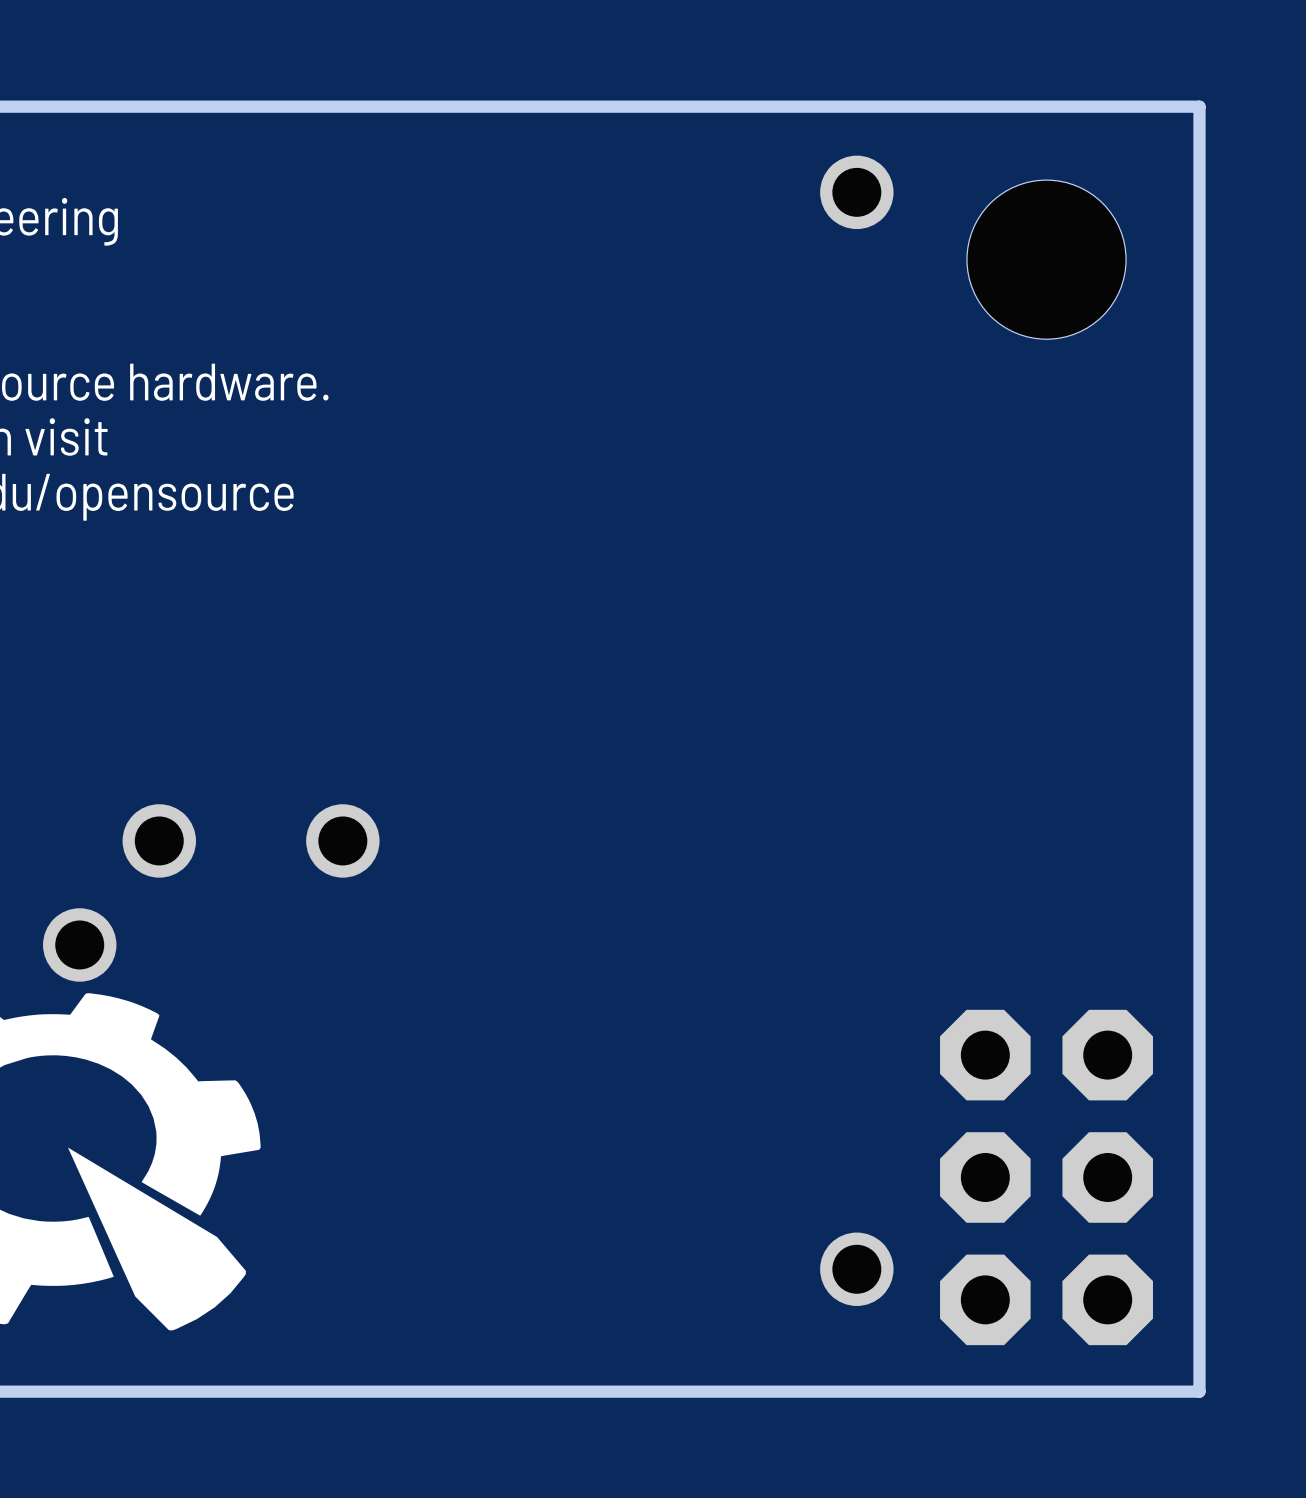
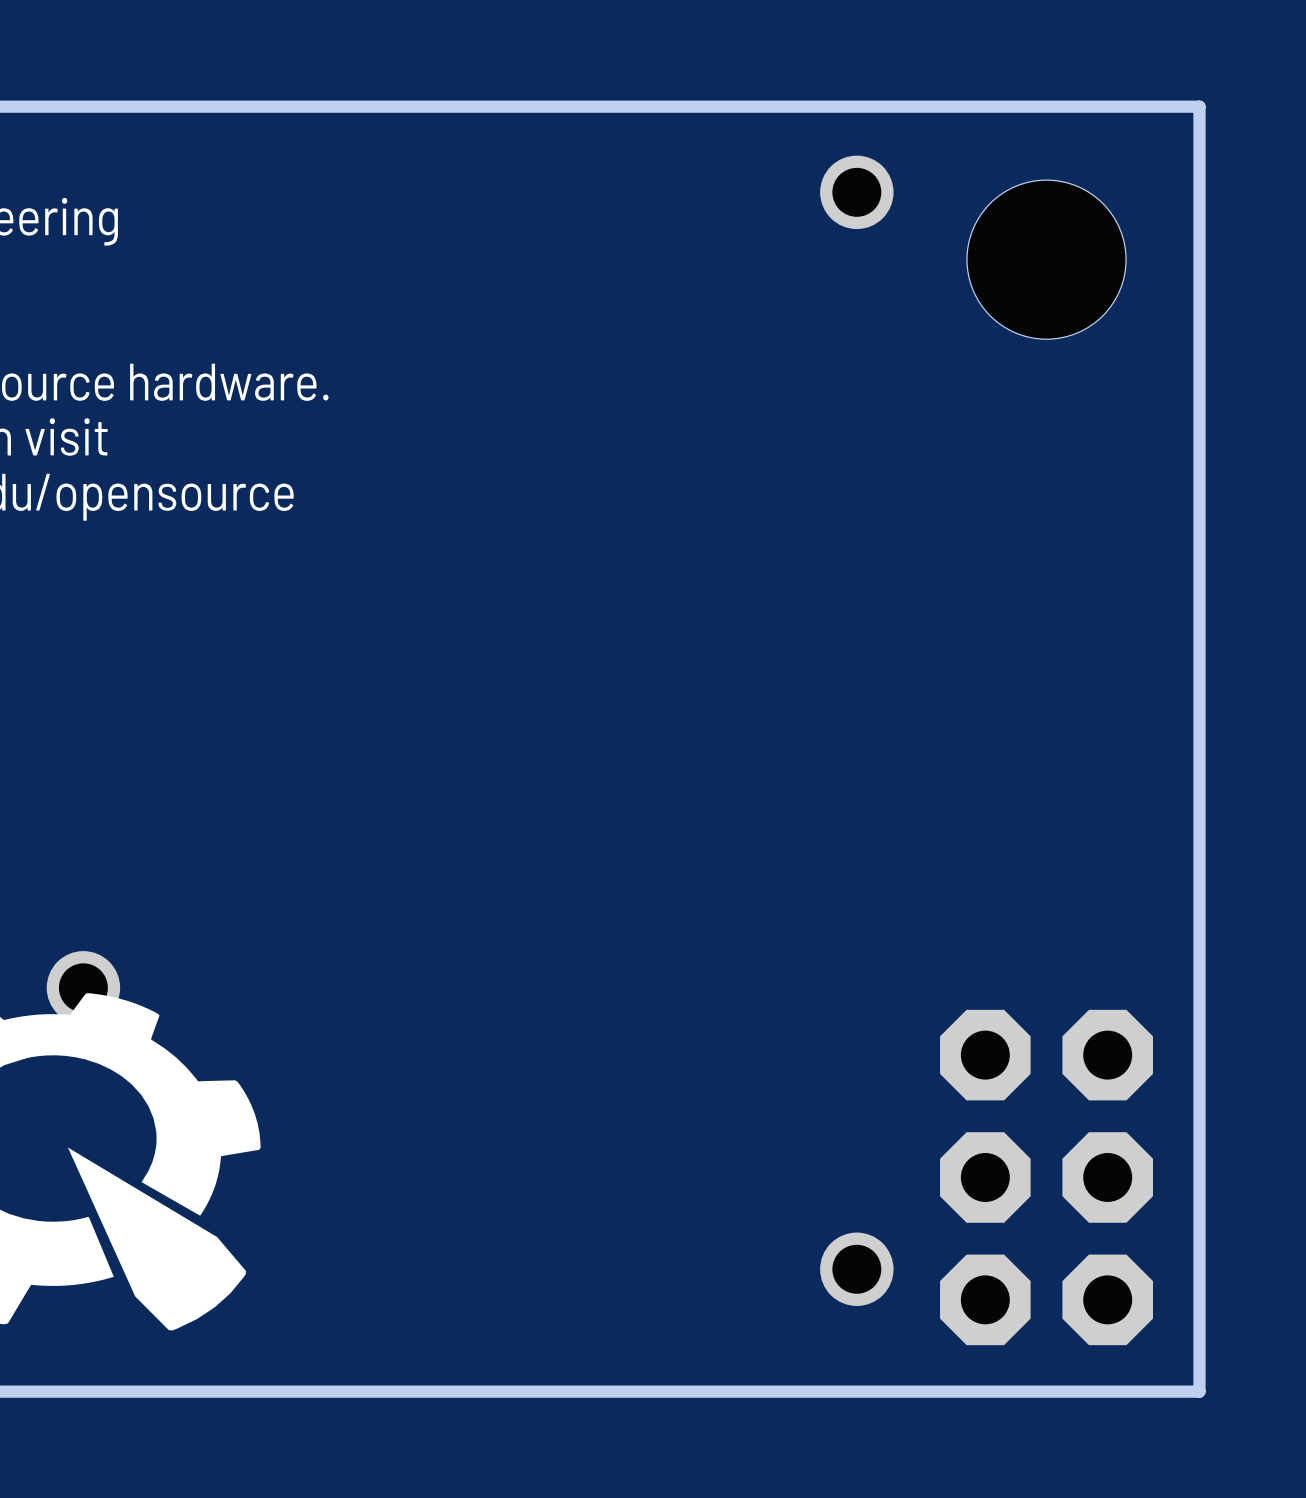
part: (159, 840) -> none
part: (342, 840) -> none
part position: (79, 944) -> (83, 987)

